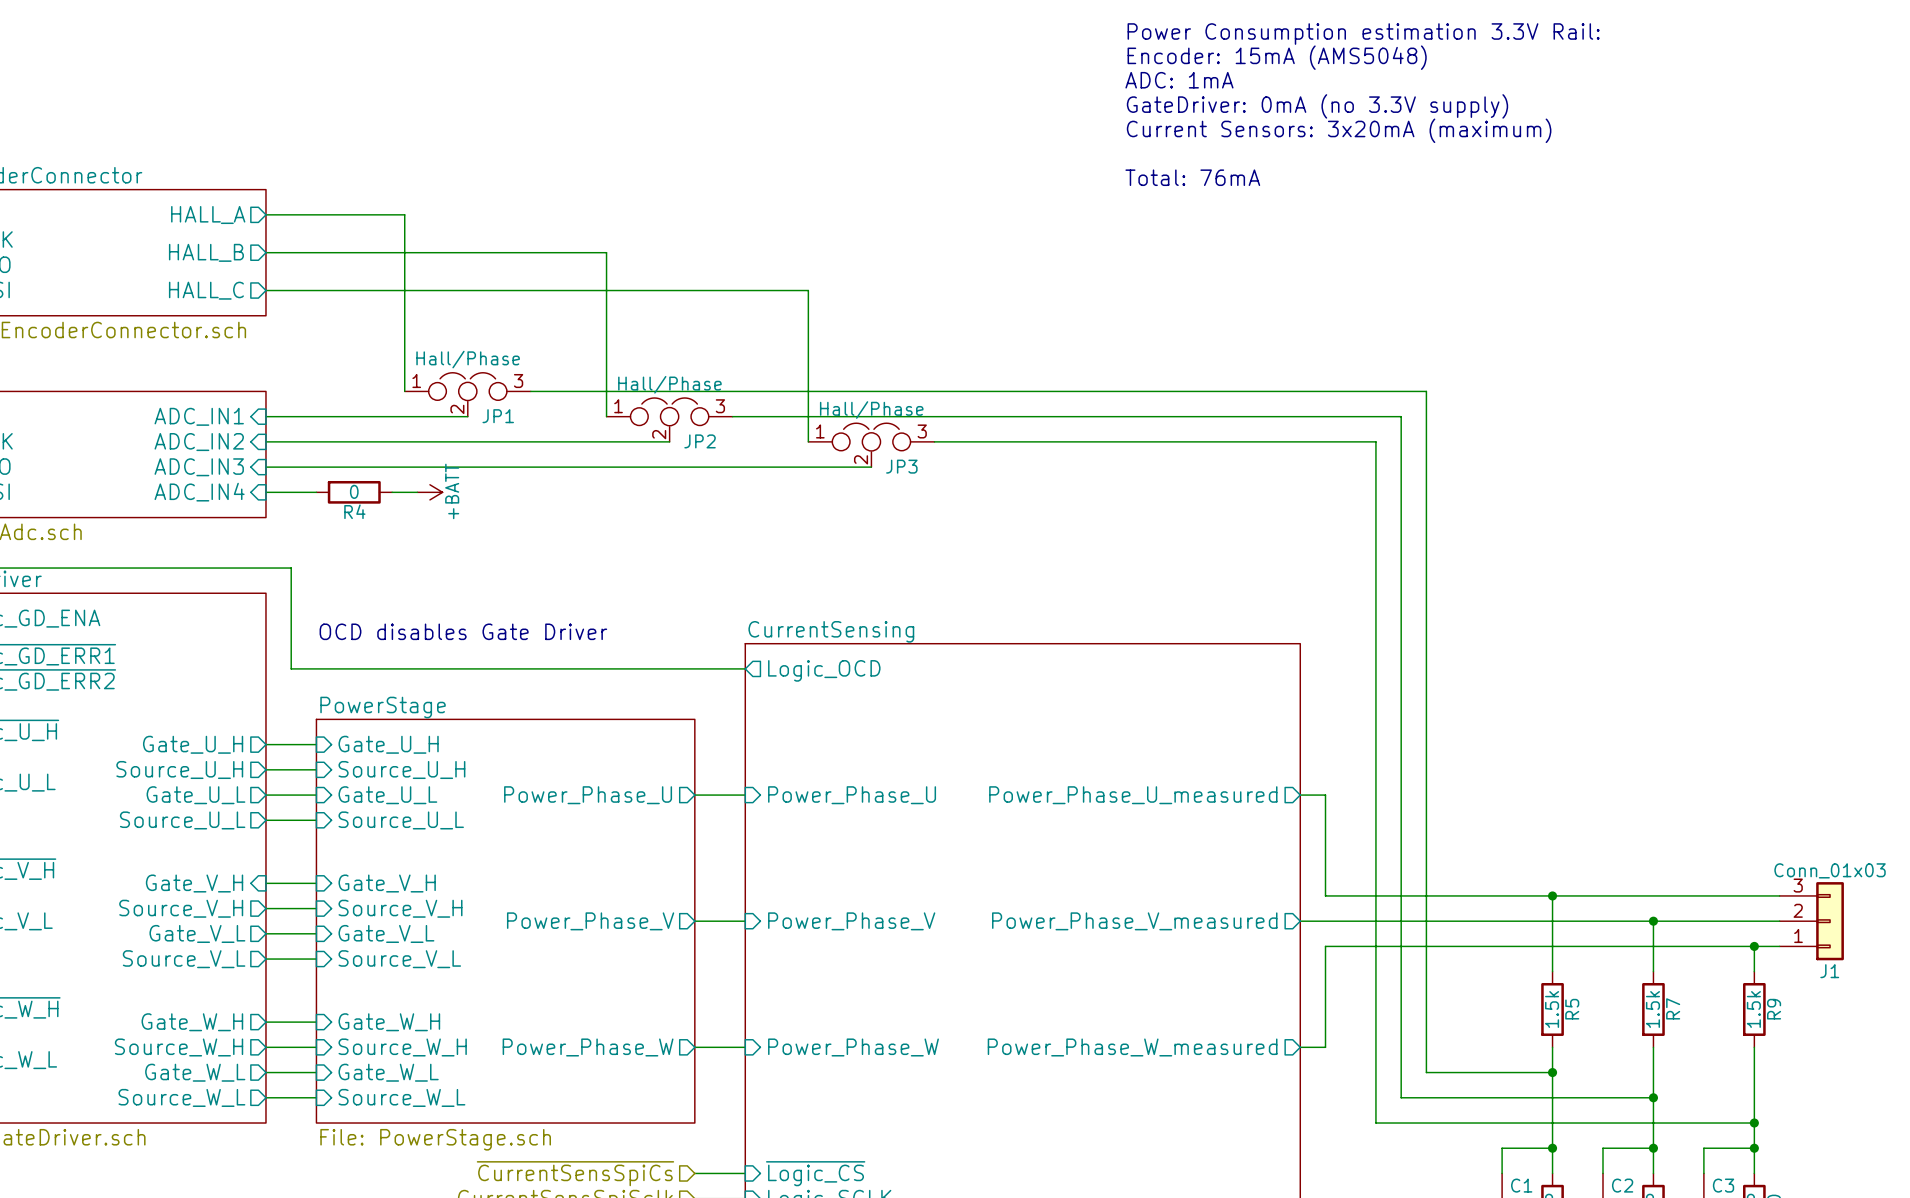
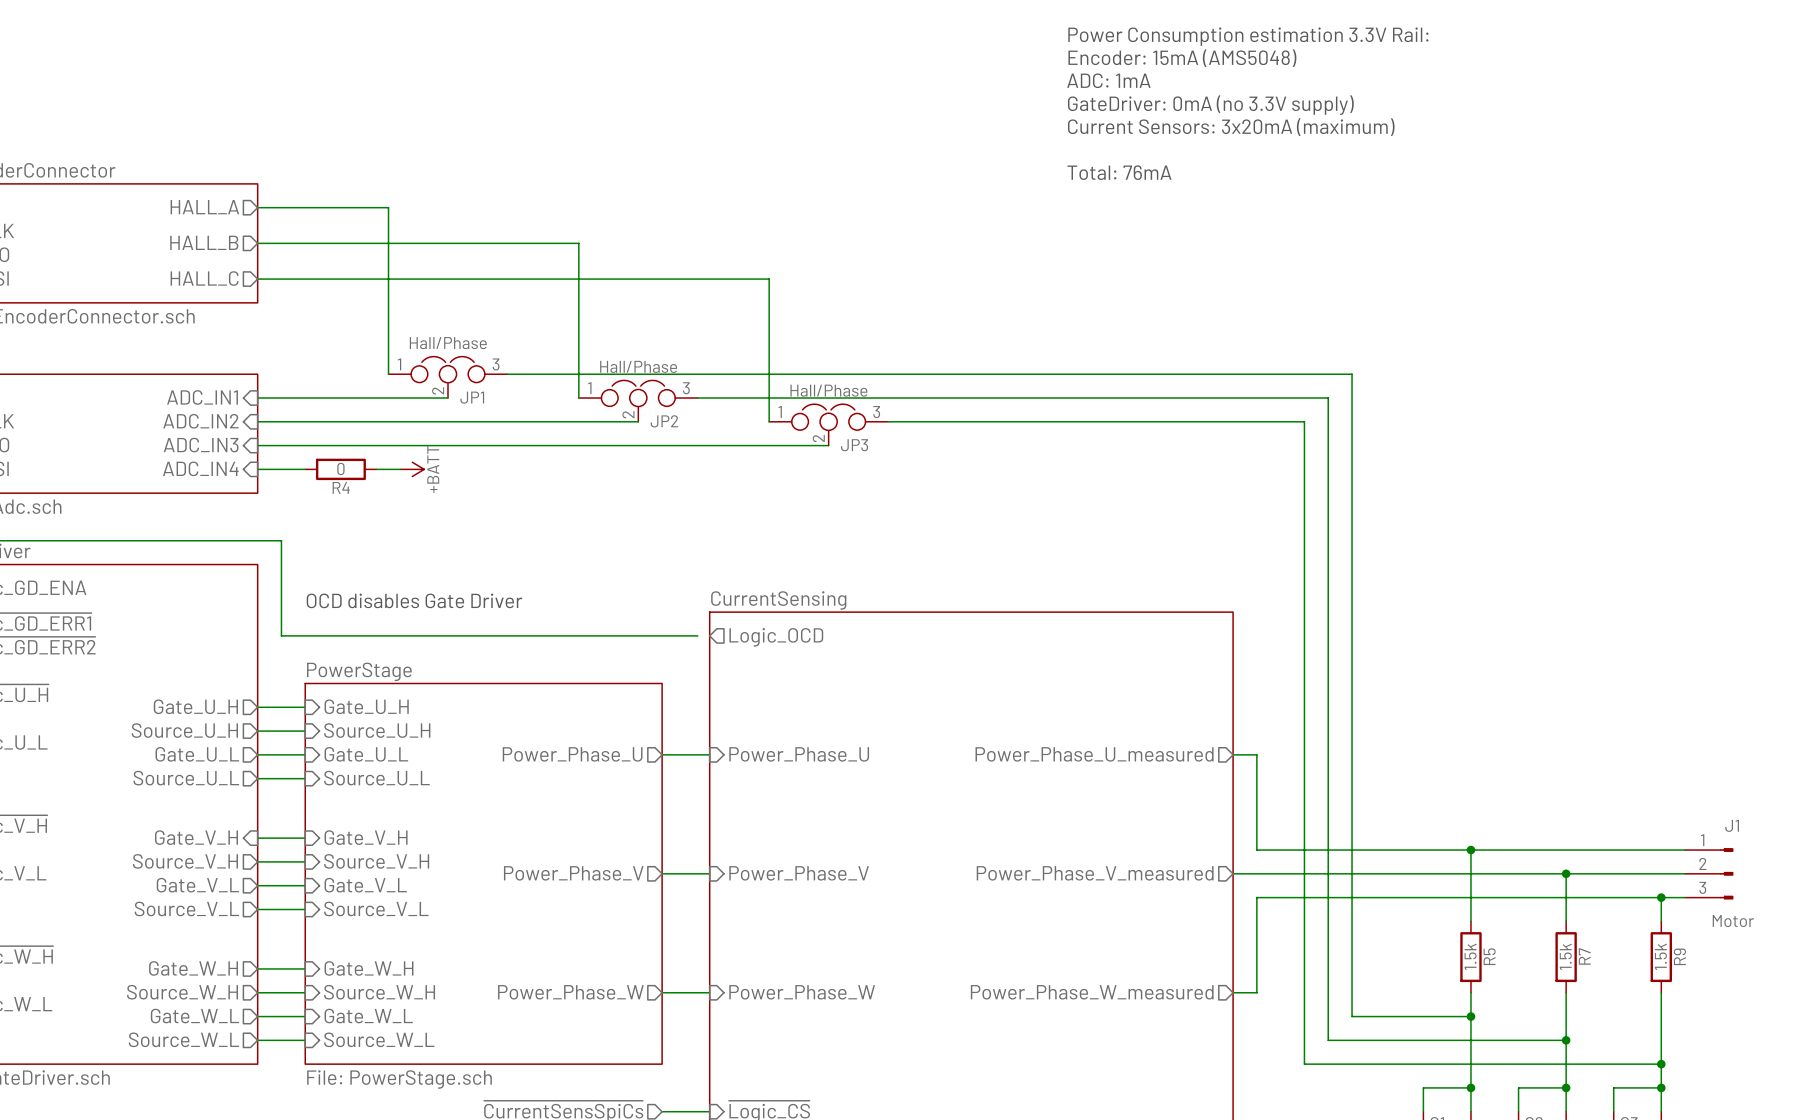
wire: (732, 668) (745, 668) -> none
J1 value: Conn_01x03 (1830, 870) -> Motor (1733, 921)
J1 symbol: [1779, 882, 1844, 961] -> [1685, 848, 1734, 900]
J1 name position: J1 (1829, 971) -> J1 (1732, 825)

